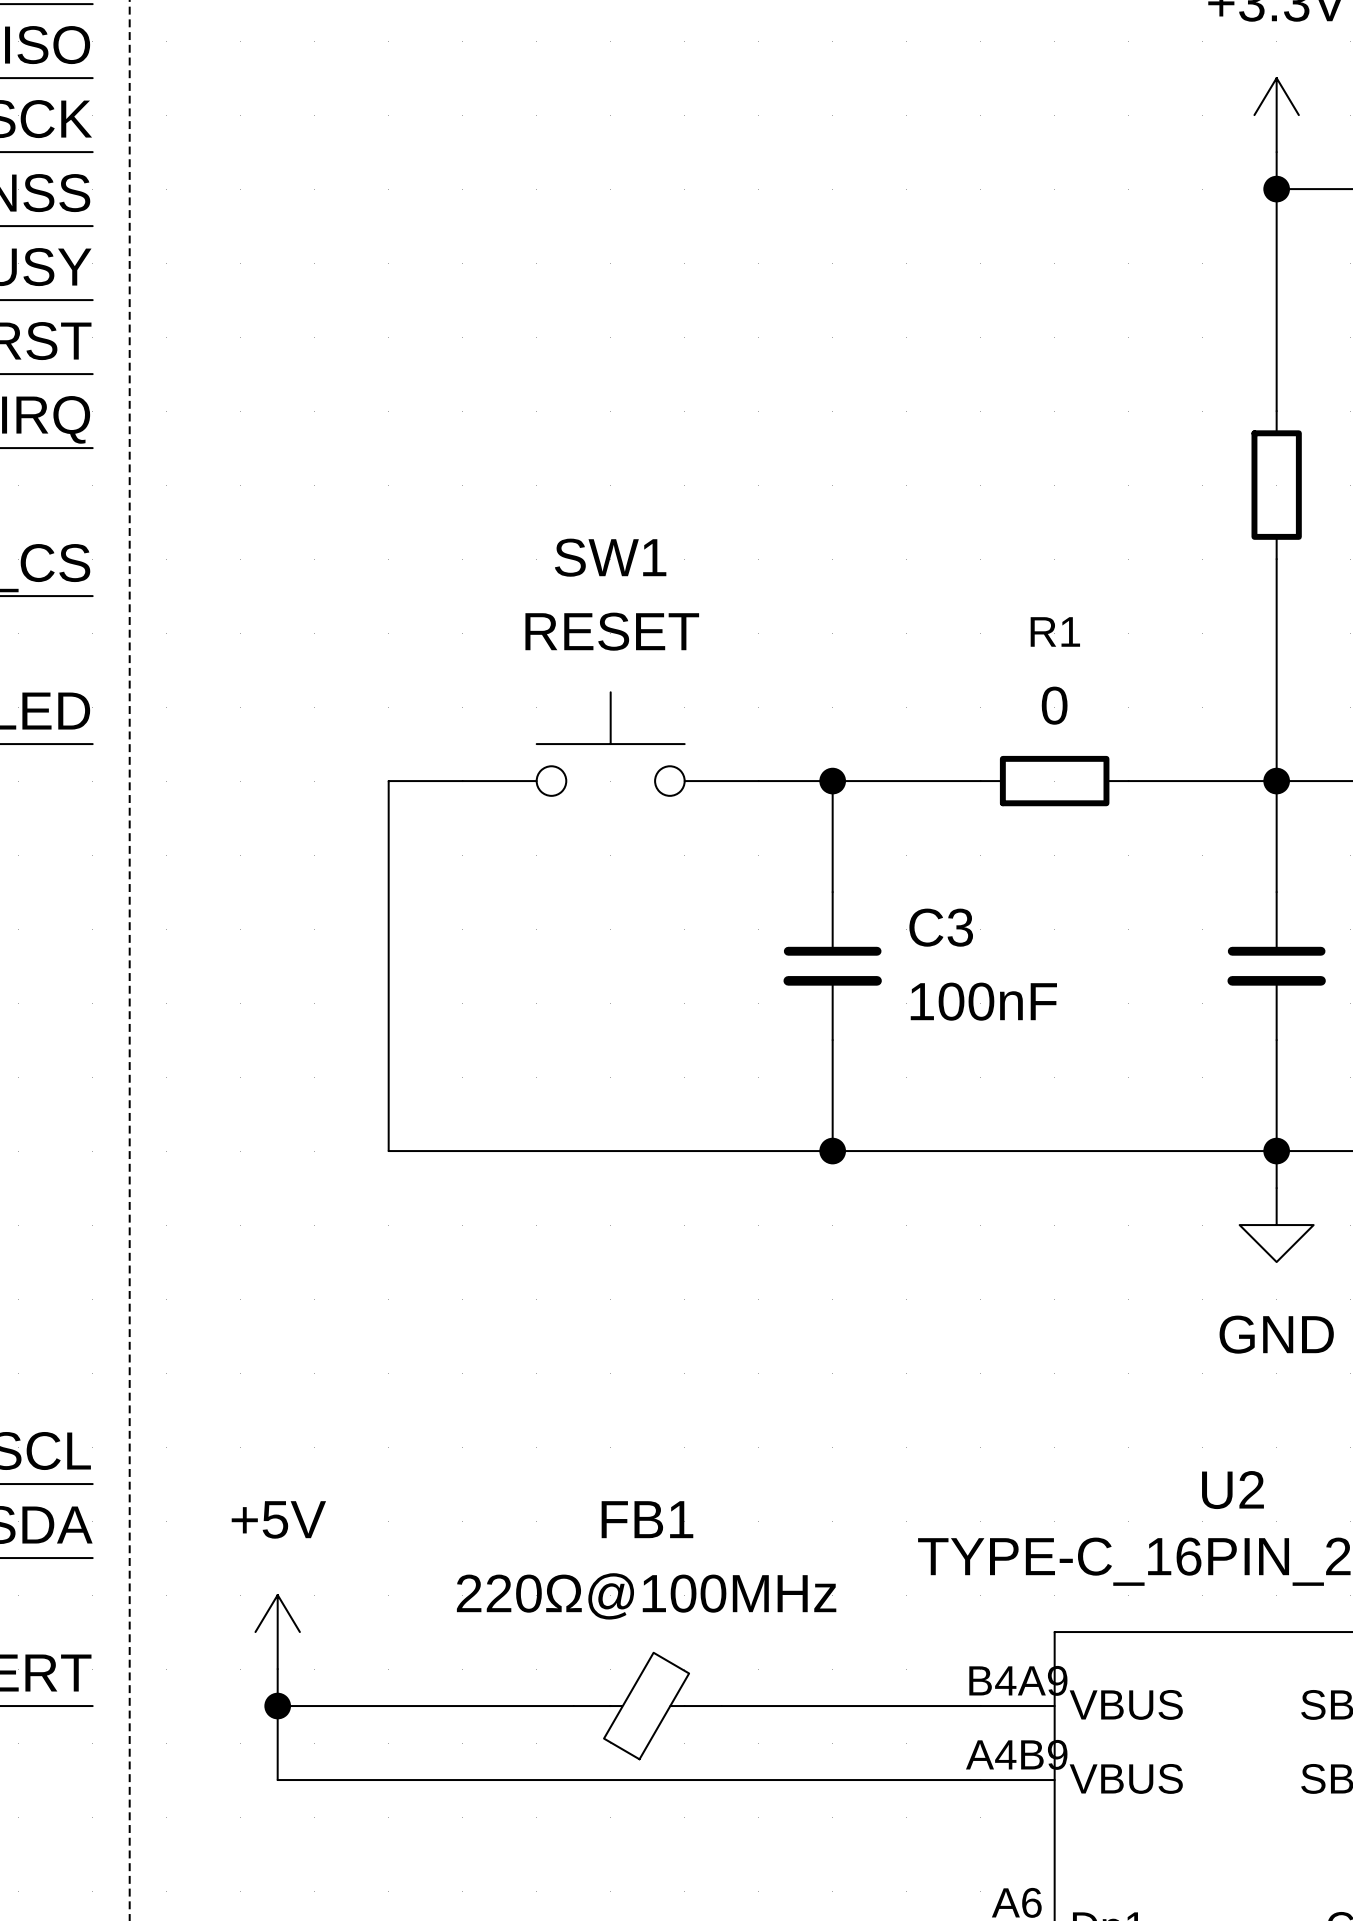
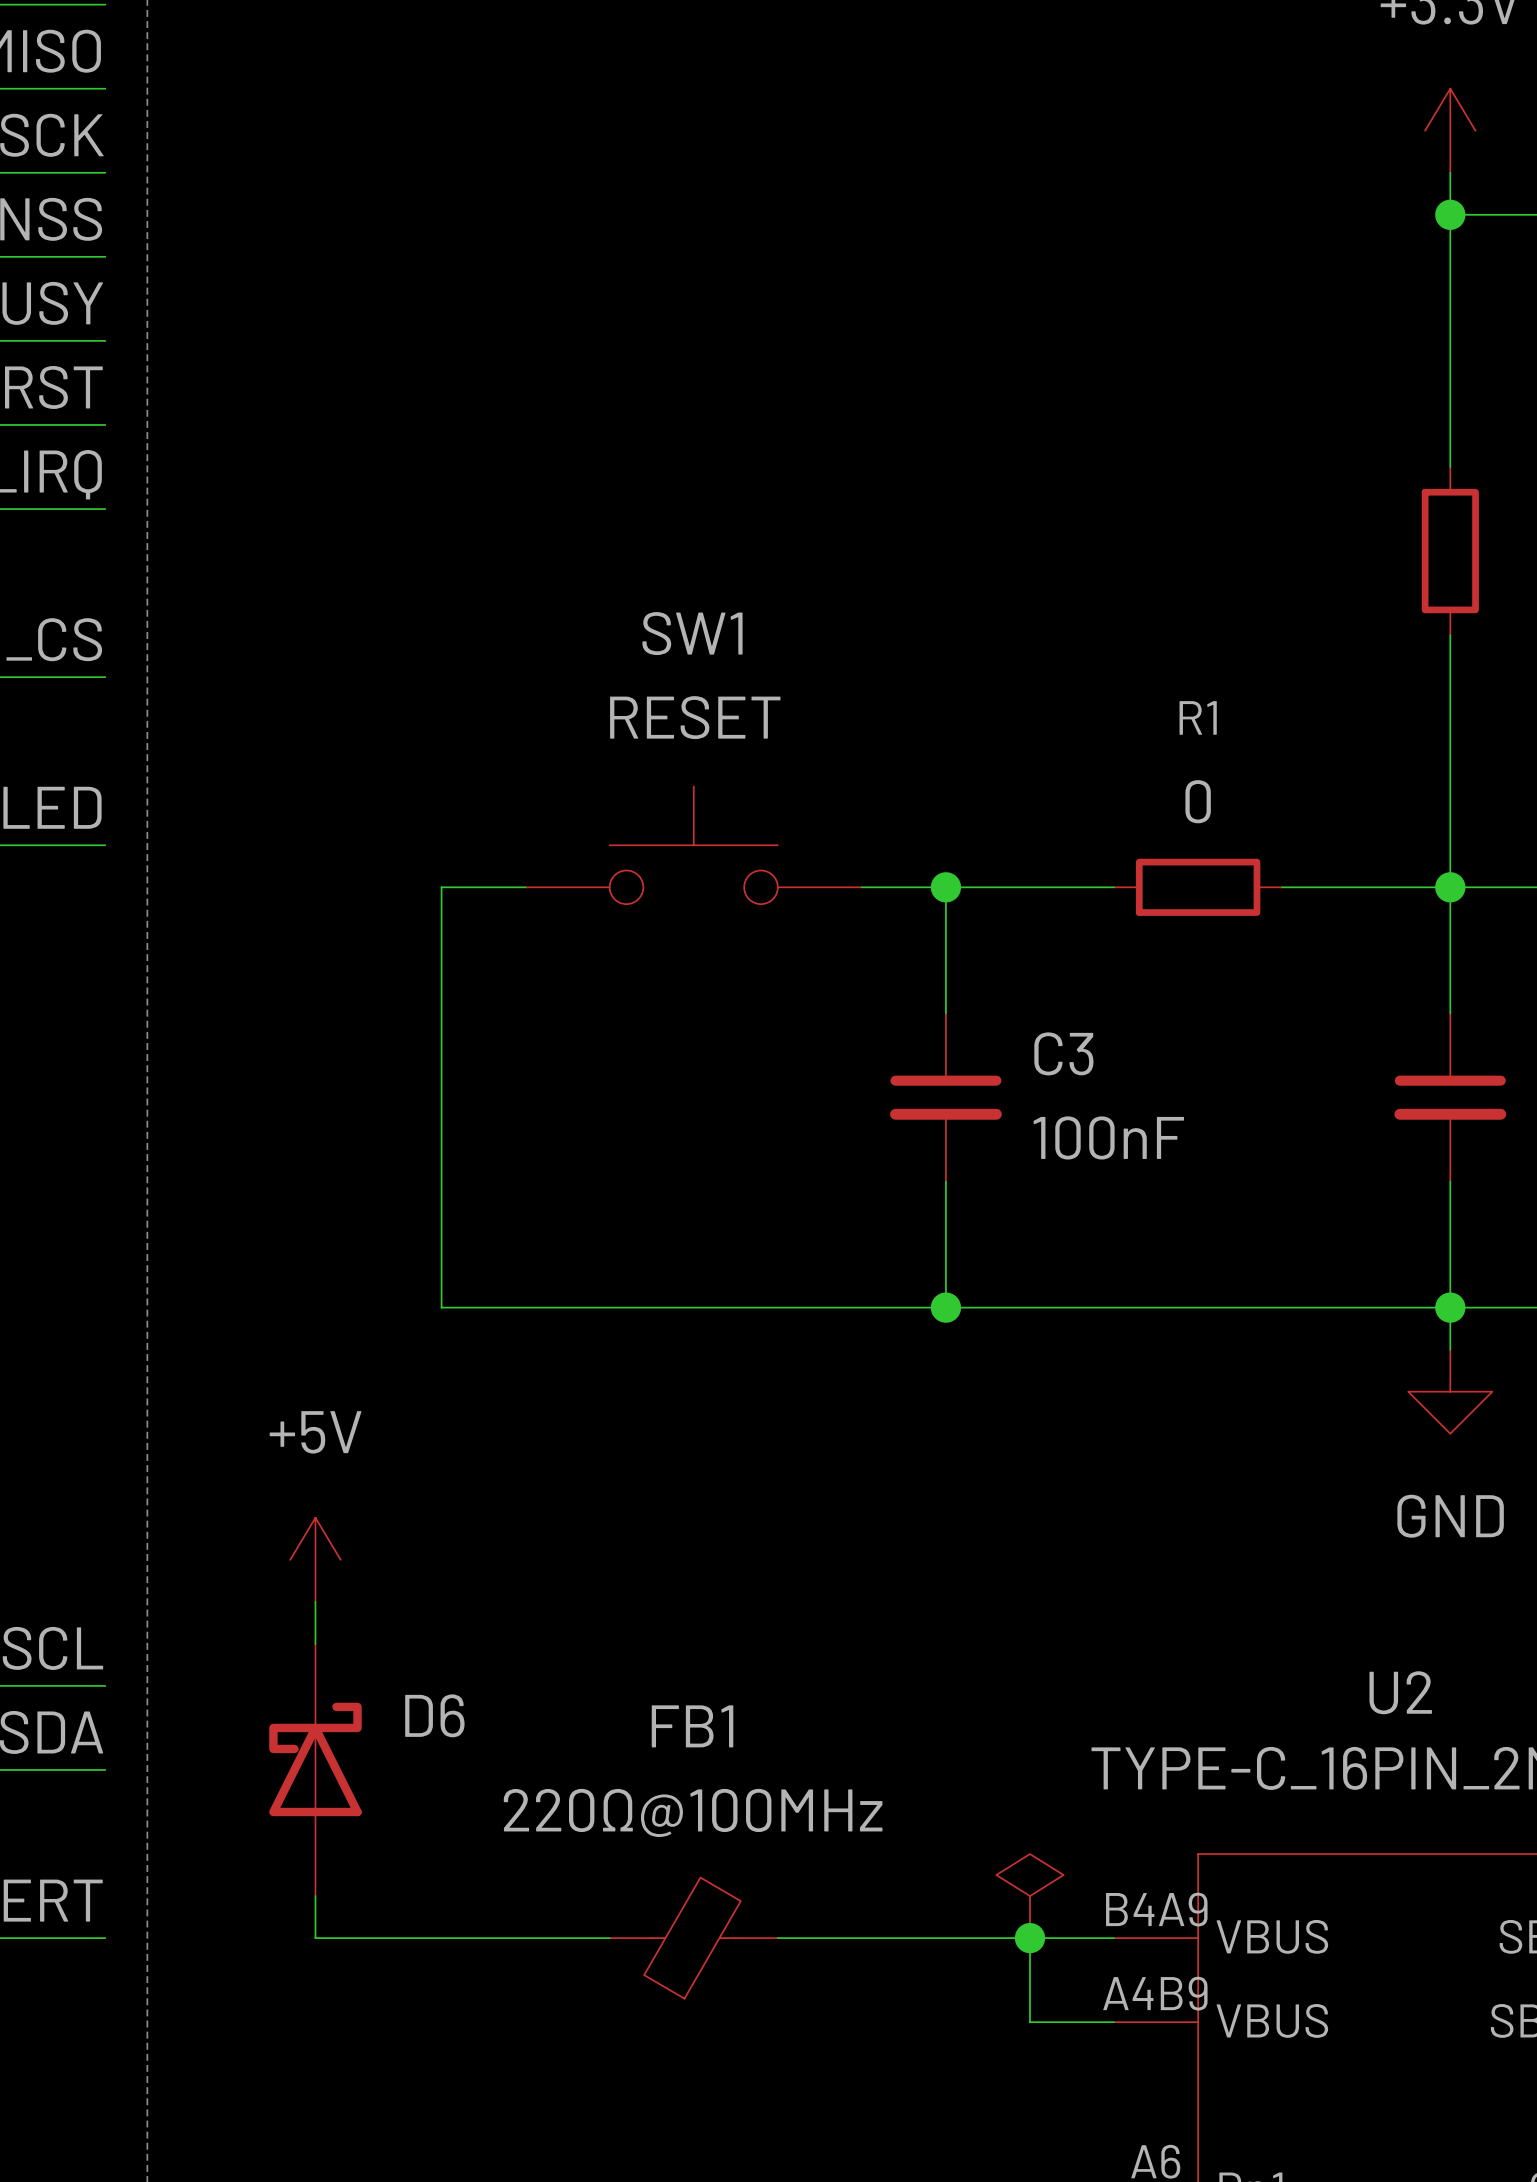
wire: none -> (315, 1601) (315, 1643)
D6: none -> (315, 1769)
power symbol position: +5V (277, 1632) -> +5V (315, 1559)
power symbol: none -> (1030, 1896)
wire: (277, 1706) (277, 1780) (906, 1780) -> (1030, 1938) (1030, 2022)
junction: (277, 1706) -> none
FB1 position: (647, 1706) -> (693, 1938)
junction: none -> (1030, 1938)

